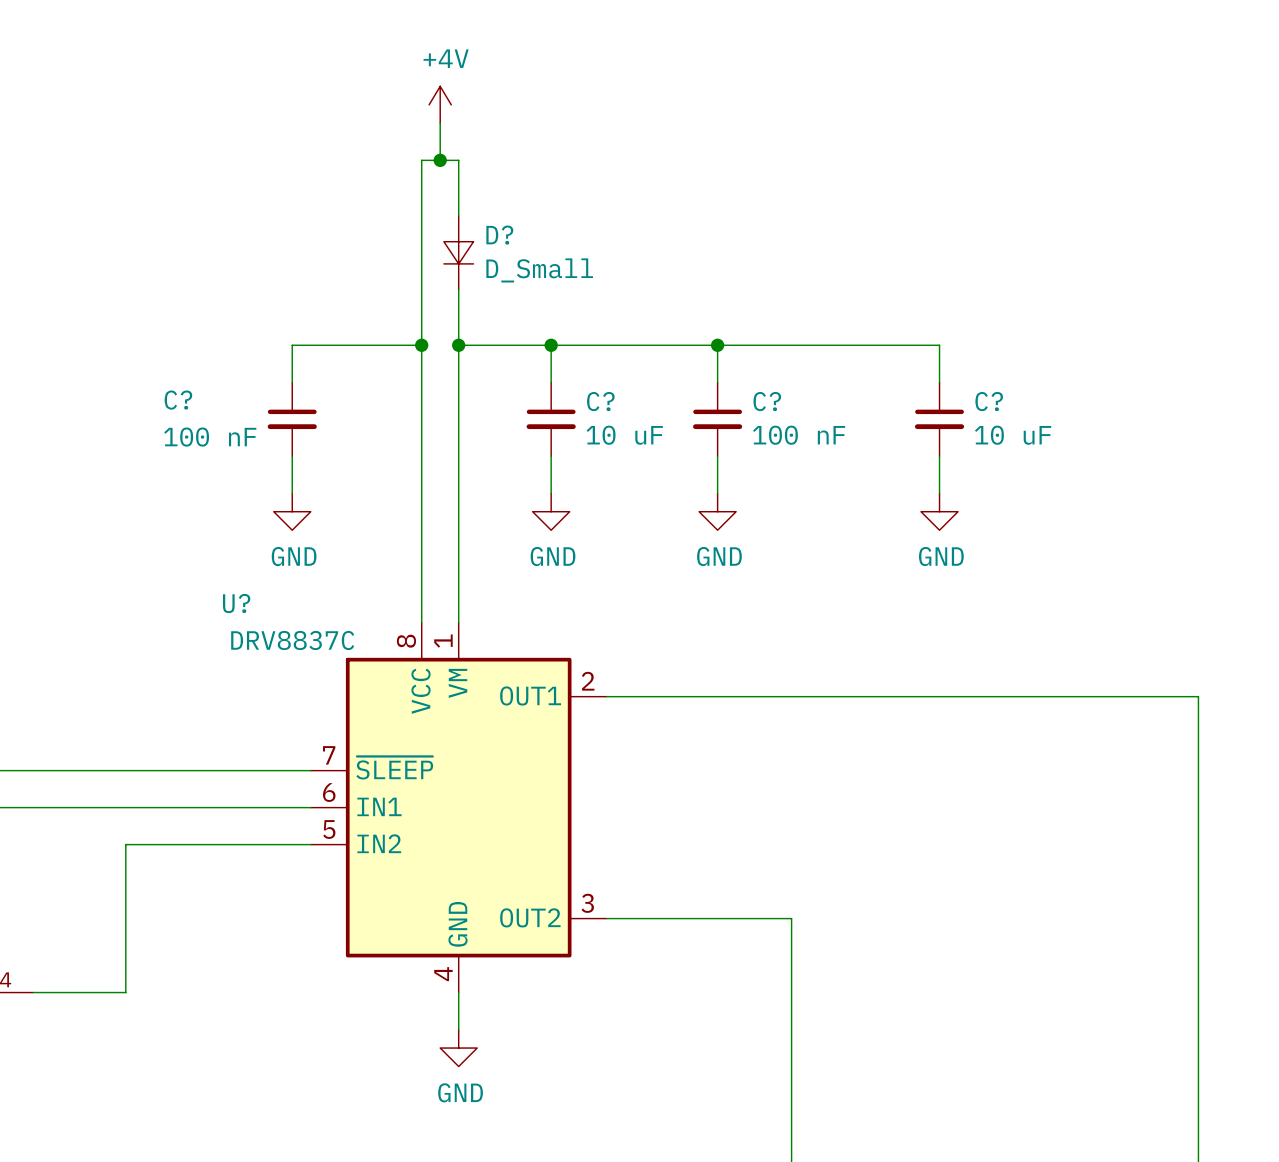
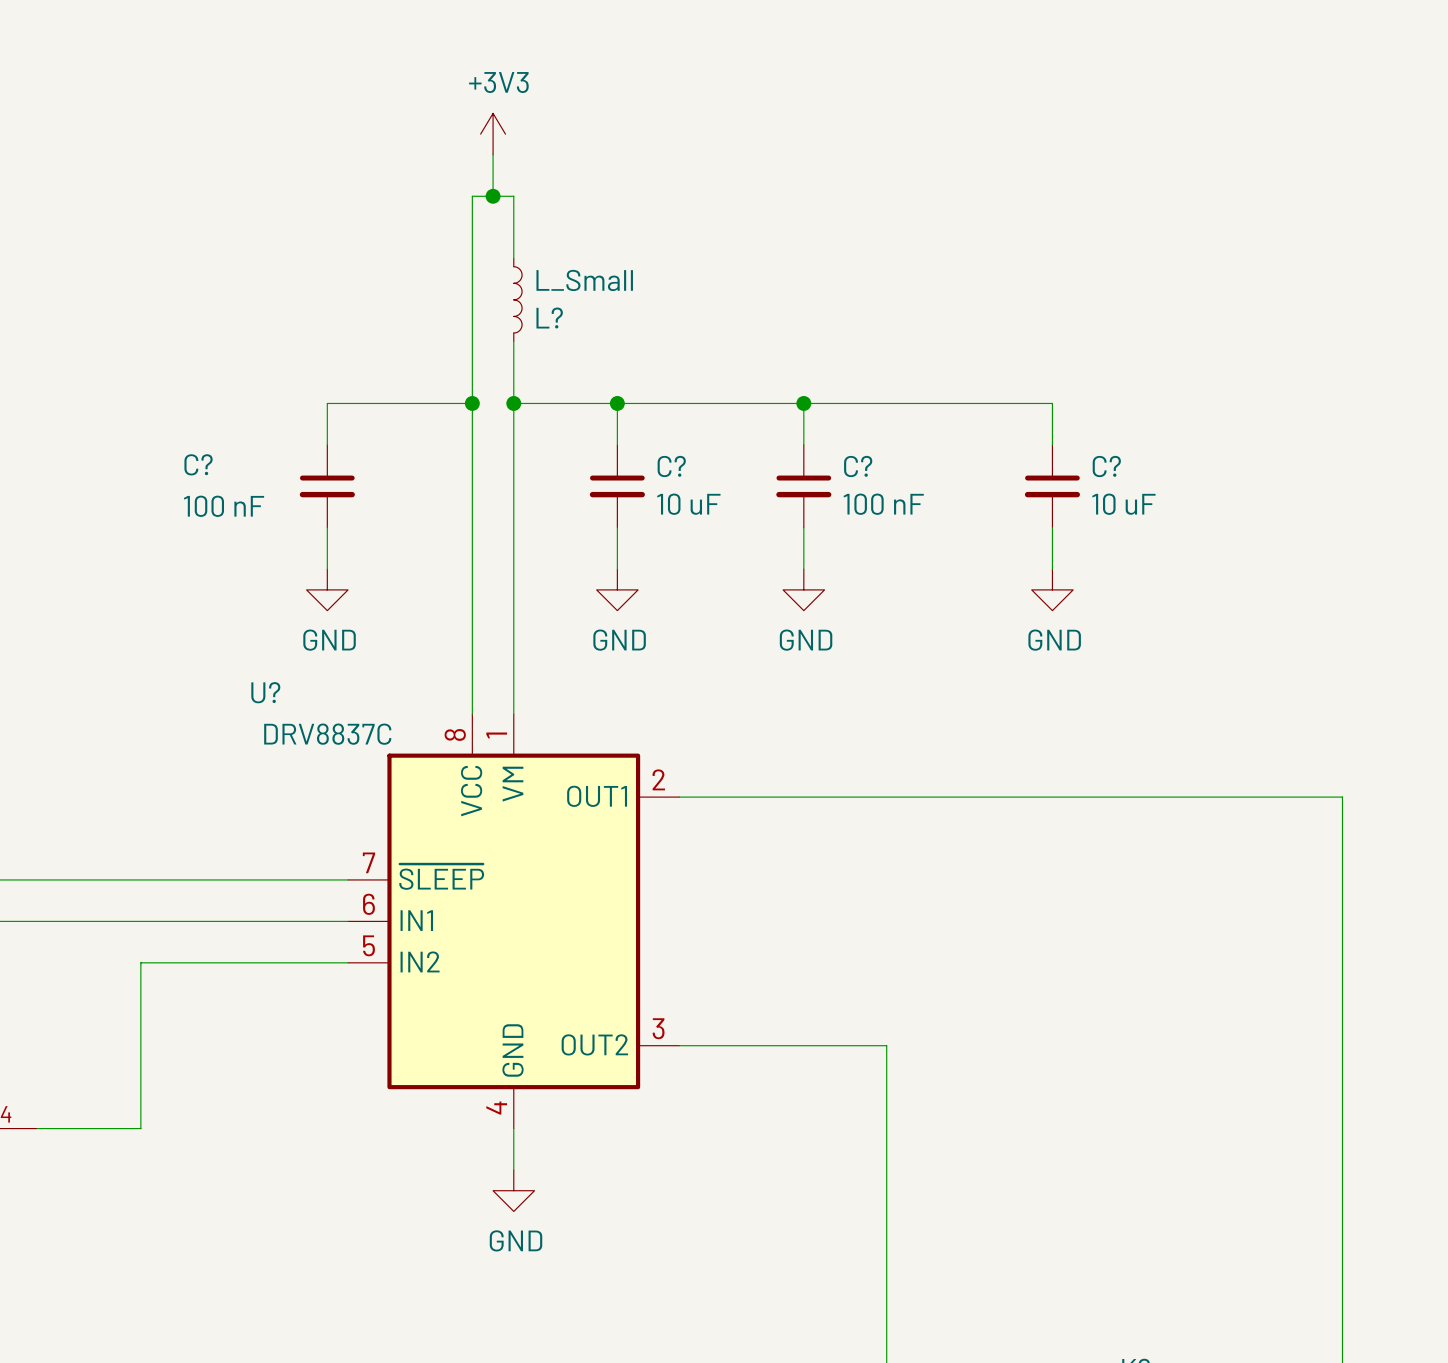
power symbol: +4V (440, 104) -> +3V3 (493, 134)
D?: D_Small (458, 252) -> none
L?: none -> L_Small (517, 299)

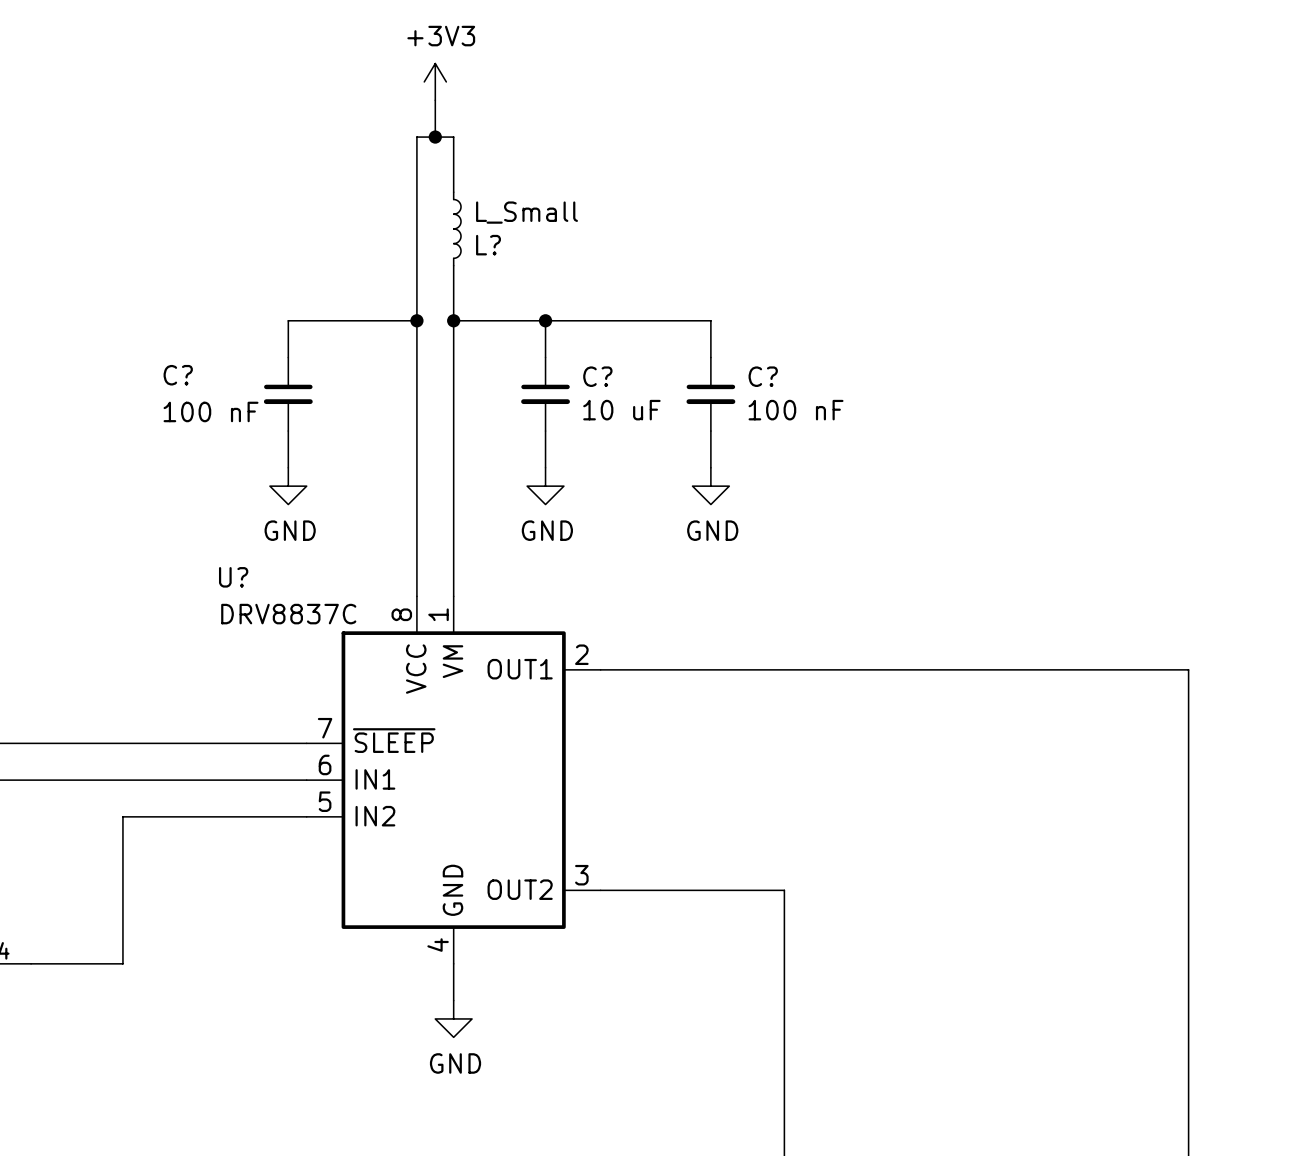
wire: (803, 403) (1052, 403) (1052, 444) -> none
junction: (803, 403) -> none
C?: 10 uF (1052, 486) -> none
wire: (1052, 527) (1052, 569) -> none
power symbol: GND (1052, 589) -> none

